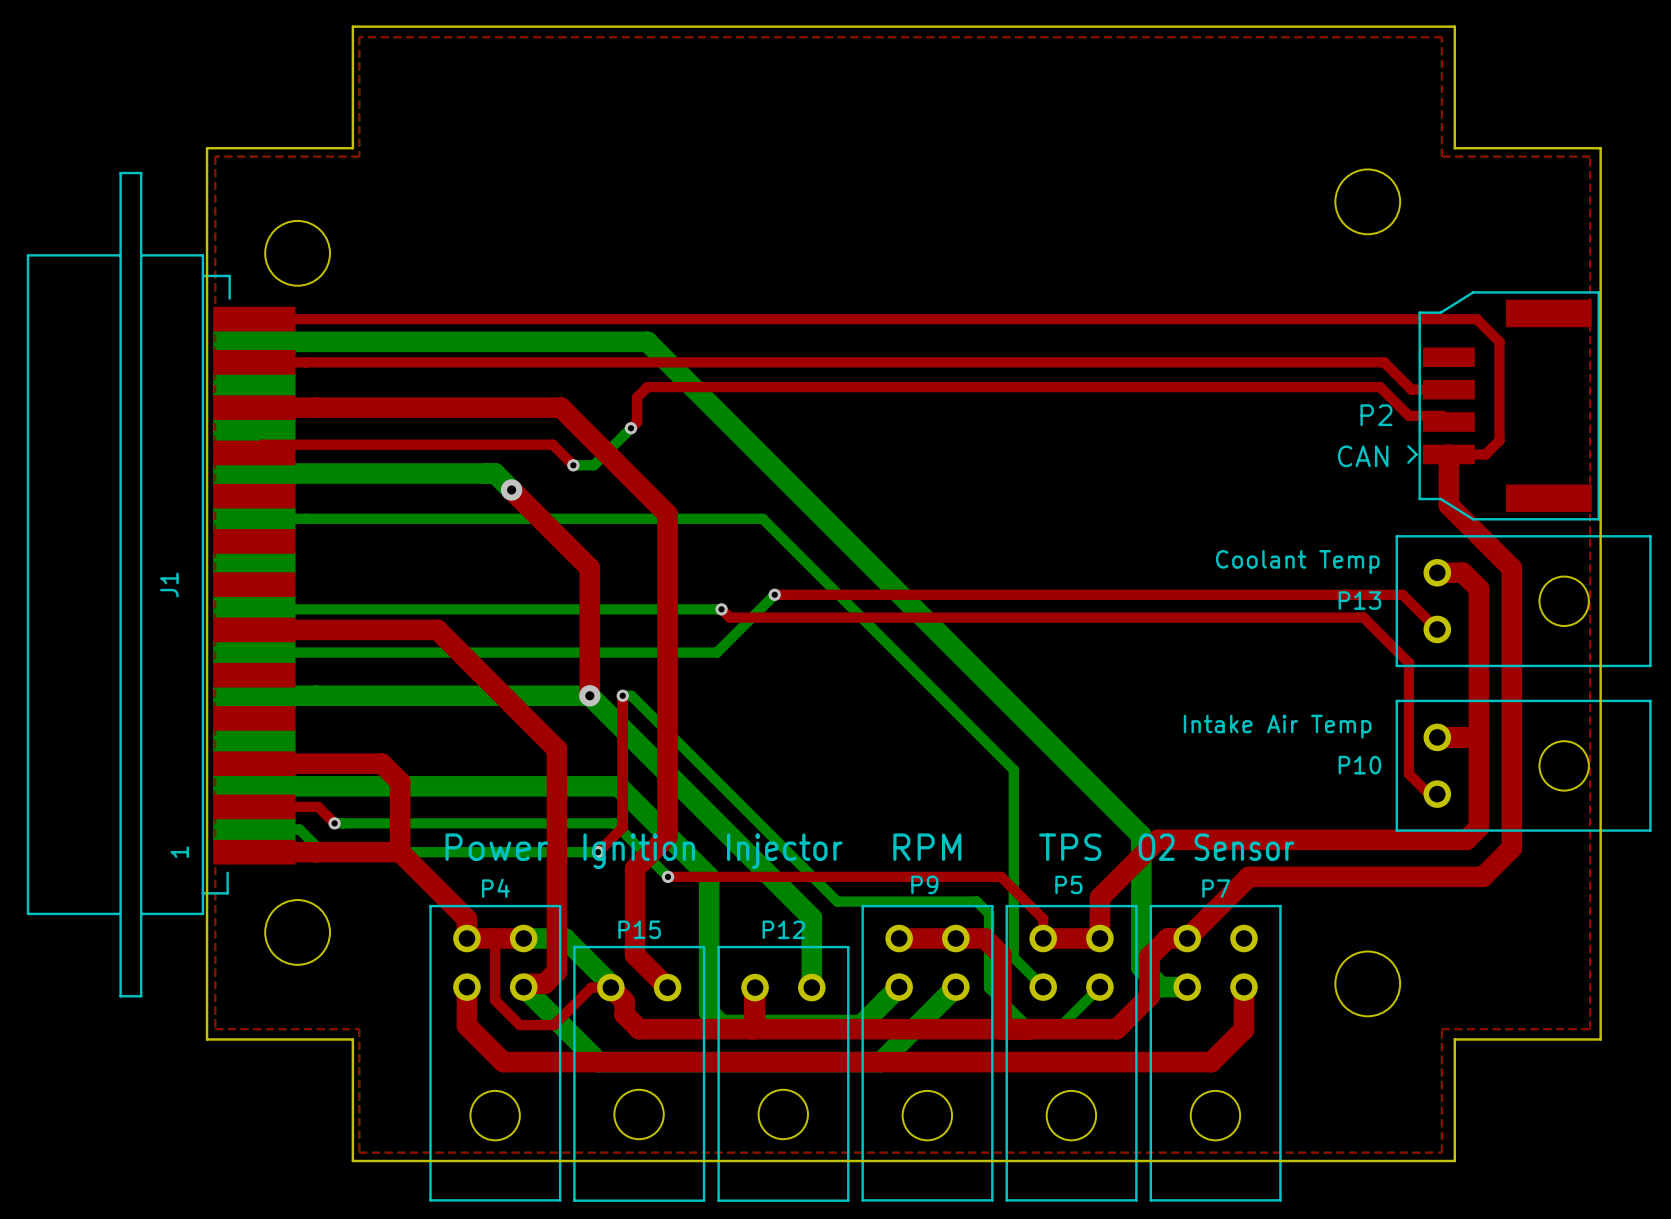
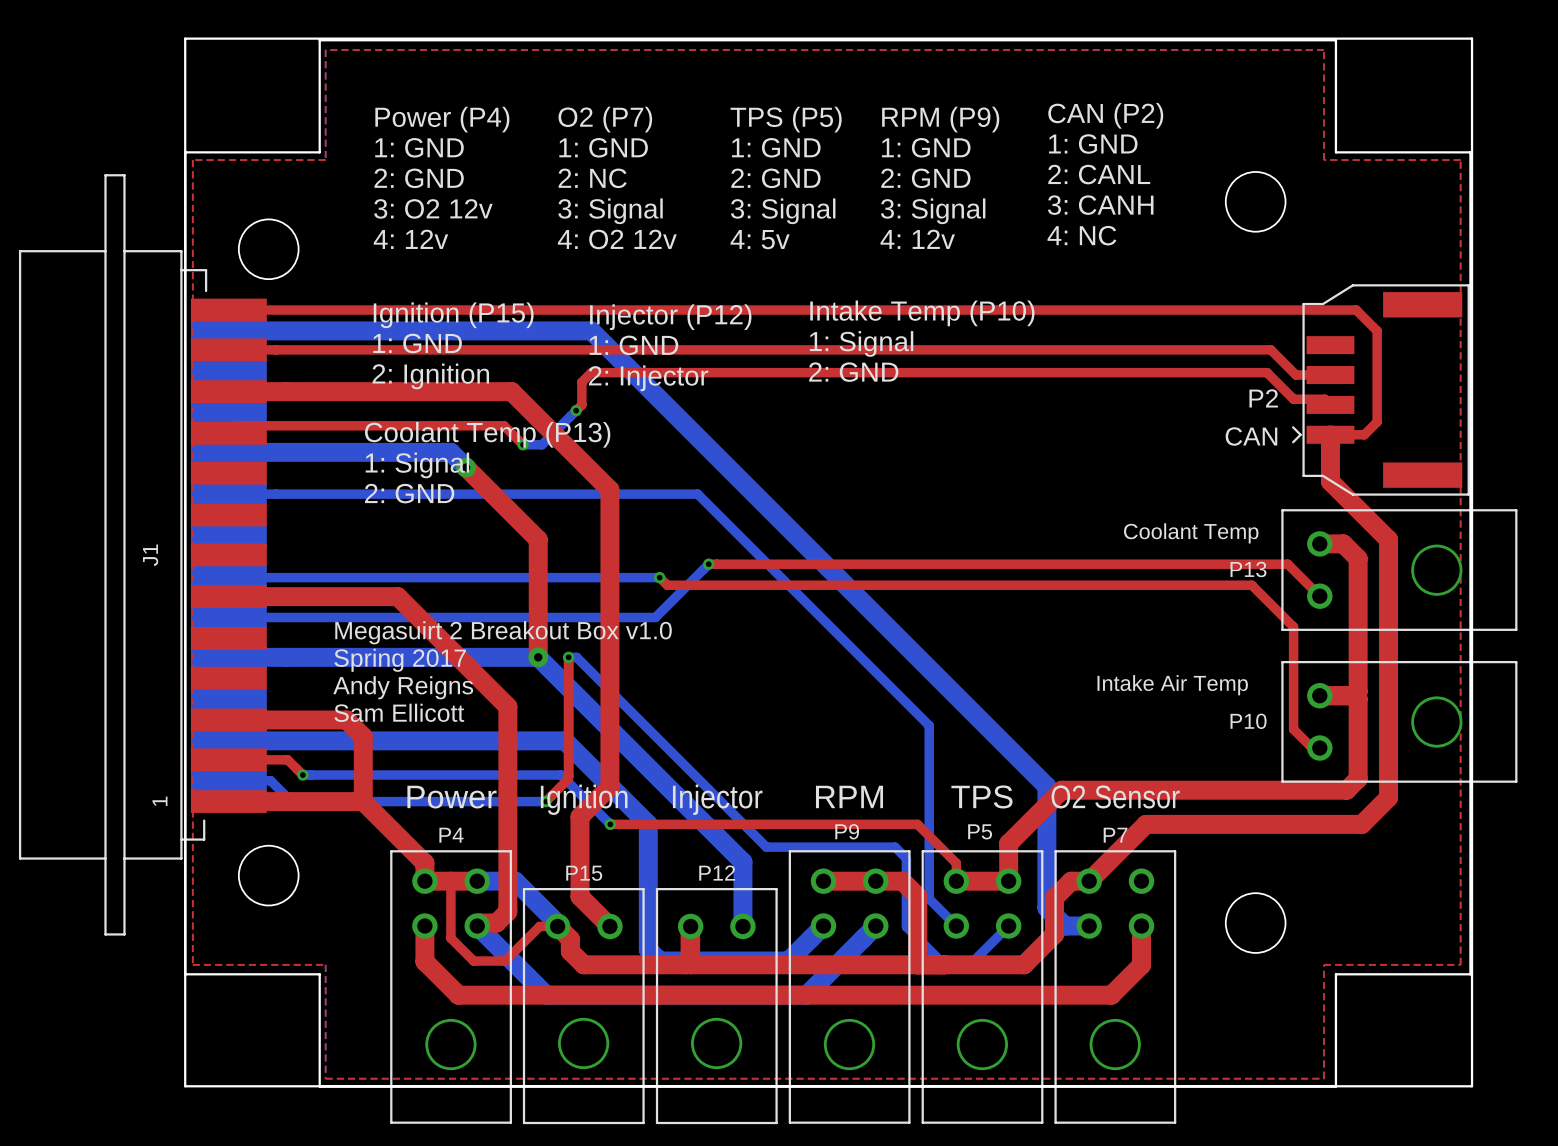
board edge: none -> (185, 38) (1472, 38) (1472, 1086) (185, 1086) (185, 38)
text: none -> CAN (P2) (1105, 115)
text: none -> Power (P4) (442, 119)
text: none -> O2 (P7) (605, 119)
text: none -> TPS (P5) (786, 119)
text: none -> RPM (P9) (940, 119)
text: none -> 1: GND (1093, 143)
text: none -> 1: GND (419, 147)
text: none -> 1: GND (603, 147)
text: none -> 1: GND (776, 147)
text: none -> 1: GND (926, 147)
text: none -> 2: CANL (1099, 174)
text: none -> 2: GND (419, 178)
text: none -> 2: NC (592, 178)
text: none -> 2: GND (775, 178)
text: none -> 2: GND (925, 178)
text: none -> 3: CANH (1100, 205)
text: none -> 3: O2 12v (433, 208)
text: none -> 3: Signal (610, 211)
text: none -> 3: Signal (783, 211)
text: none -> 3: Signal (933, 211)
text: none -> 4: NC (1081, 235)
text: none -> 4: 12v (410, 239)
text: none -> 4: O2 12v (617, 239)
text: none -> 4: 5v (760, 239)
text: none -> 4: 12v (917, 239)
text: none -> Intake Temp (P10) (922, 313)
text: none -> Ignition (P15) (453, 315)
text: none -> Injector (P12) (670, 317)
text: none -> 1: GND (417, 343)
text: none -> 1: Signal (861, 343)
text: none -> 1: GND (633, 345)
text: none -> 2: GND (853, 372)
text: none -> 2: Ignition (430, 376)
text: none -> 2: Injector (648, 378)
text: none -> Coolant Temp (P13) (487, 434)
text: none -> 1: Signal (417, 465)
text: none -> 2: GND (409, 493)
P13 footprint: [1395, 535, 1652, 668] -> [1281, 509, 1518, 631]
text: none -> Megasuirt 2 Breakout Box v1.0 (503, 632)
text: none -> Spring 2017 (400, 660)
P10 footprint: [1395, 699, 1652, 832] -> [1281, 660, 1518, 783]
text: none -> Andy Reigns (403, 687)
text: none -> Sam Ellicott (399, 712)
P4 footprint: [429, 904, 562, 1202] -> [390, 850, 512, 1124]
P9 footprint: [861, 904, 994, 1202] -> [788, 850, 911, 1124]
P5 footprint: [1005, 904, 1138, 1202] -> [921, 850, 1044, 1124]
P7 footprint: [1149, 904, 1282, 1202] -> [1054, 850, 1177, 1124]
P15 footprint: [573, 945, 706, 1202] -> [522, 887, 645, 1125]
P12 footprint: [717, 945, 850, 1202] -> [655, 887, 778, 1125]

